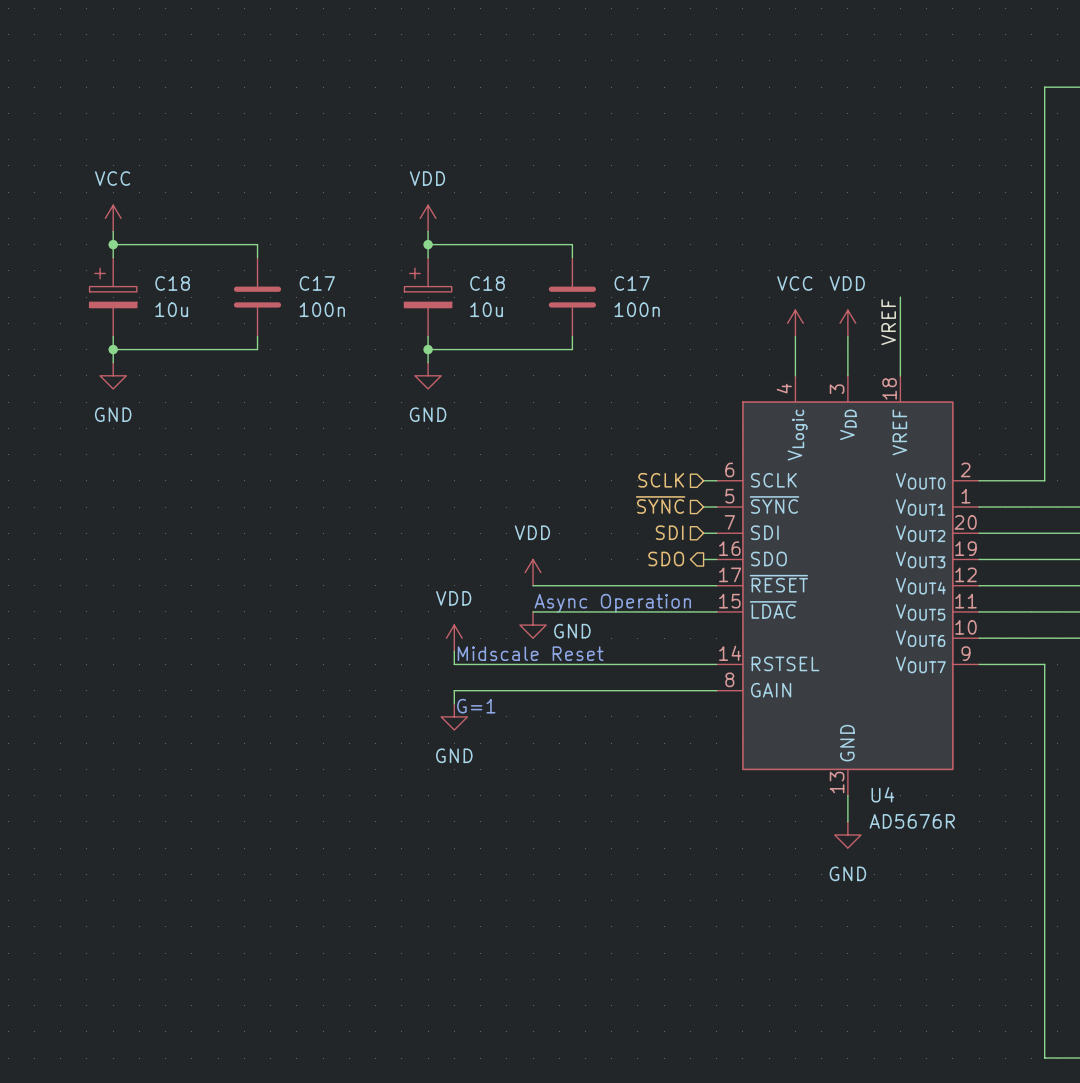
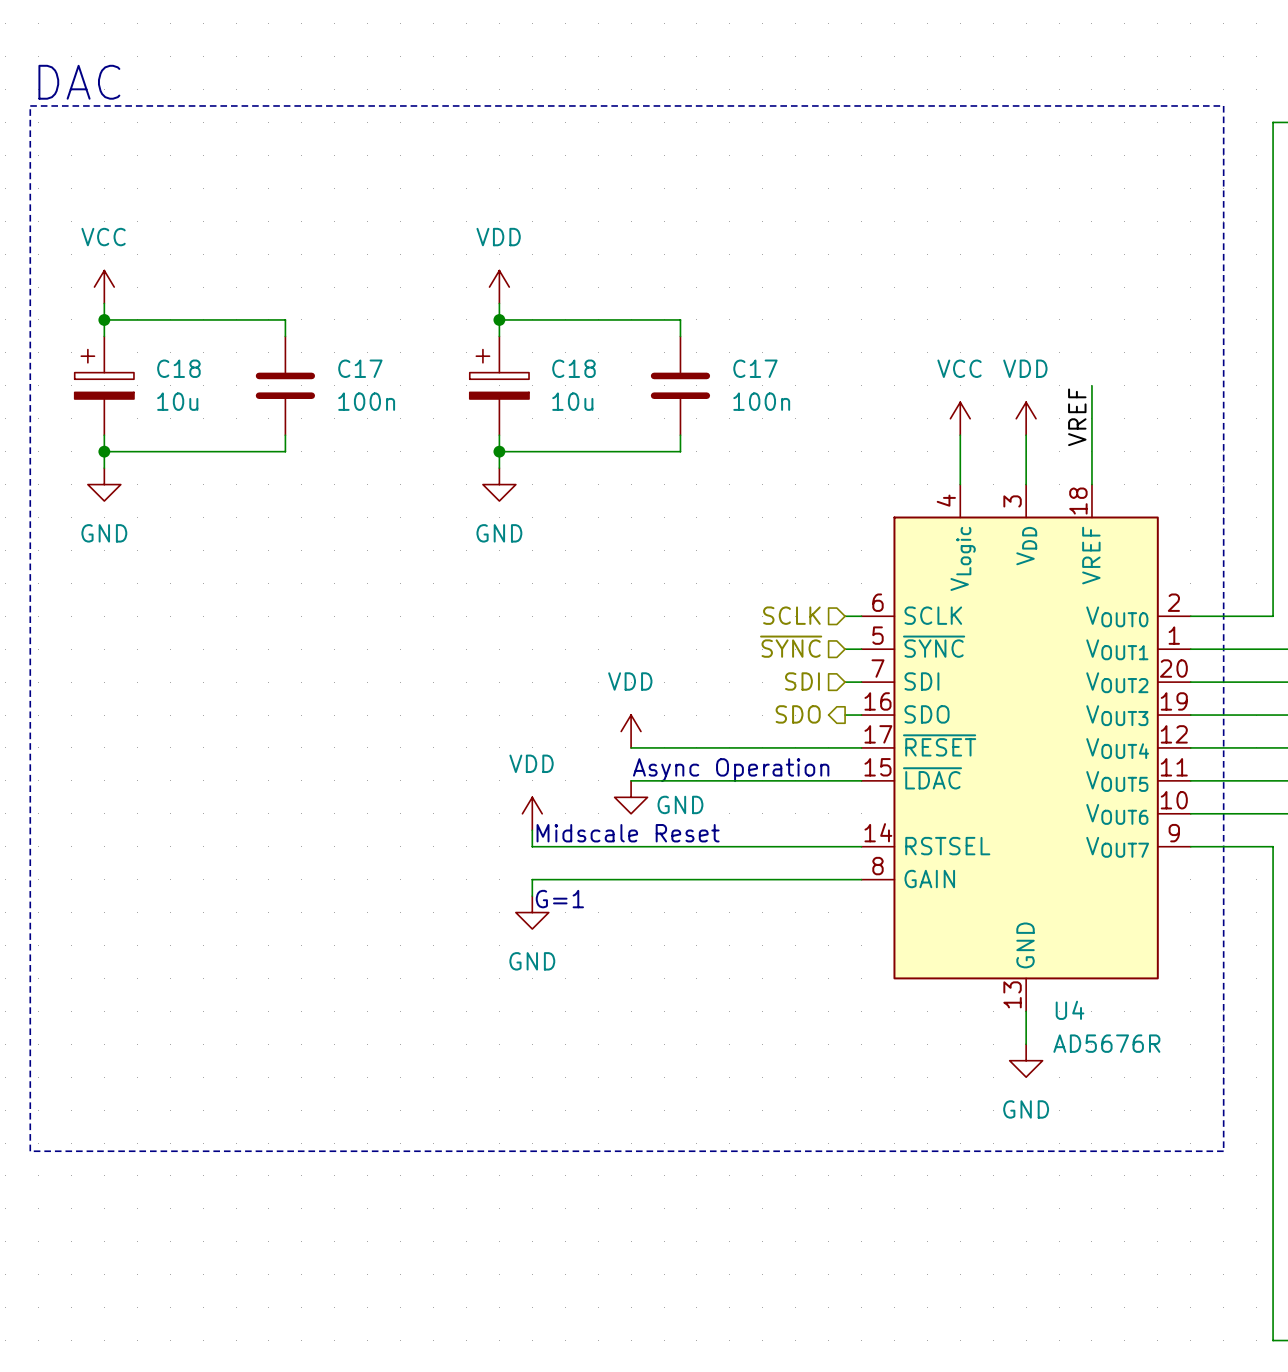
text: none -> DAC (79, 82)
line: none -> (30, 105) (1223, 105) (1223, 1151) (30, 1151) (30, 105)

